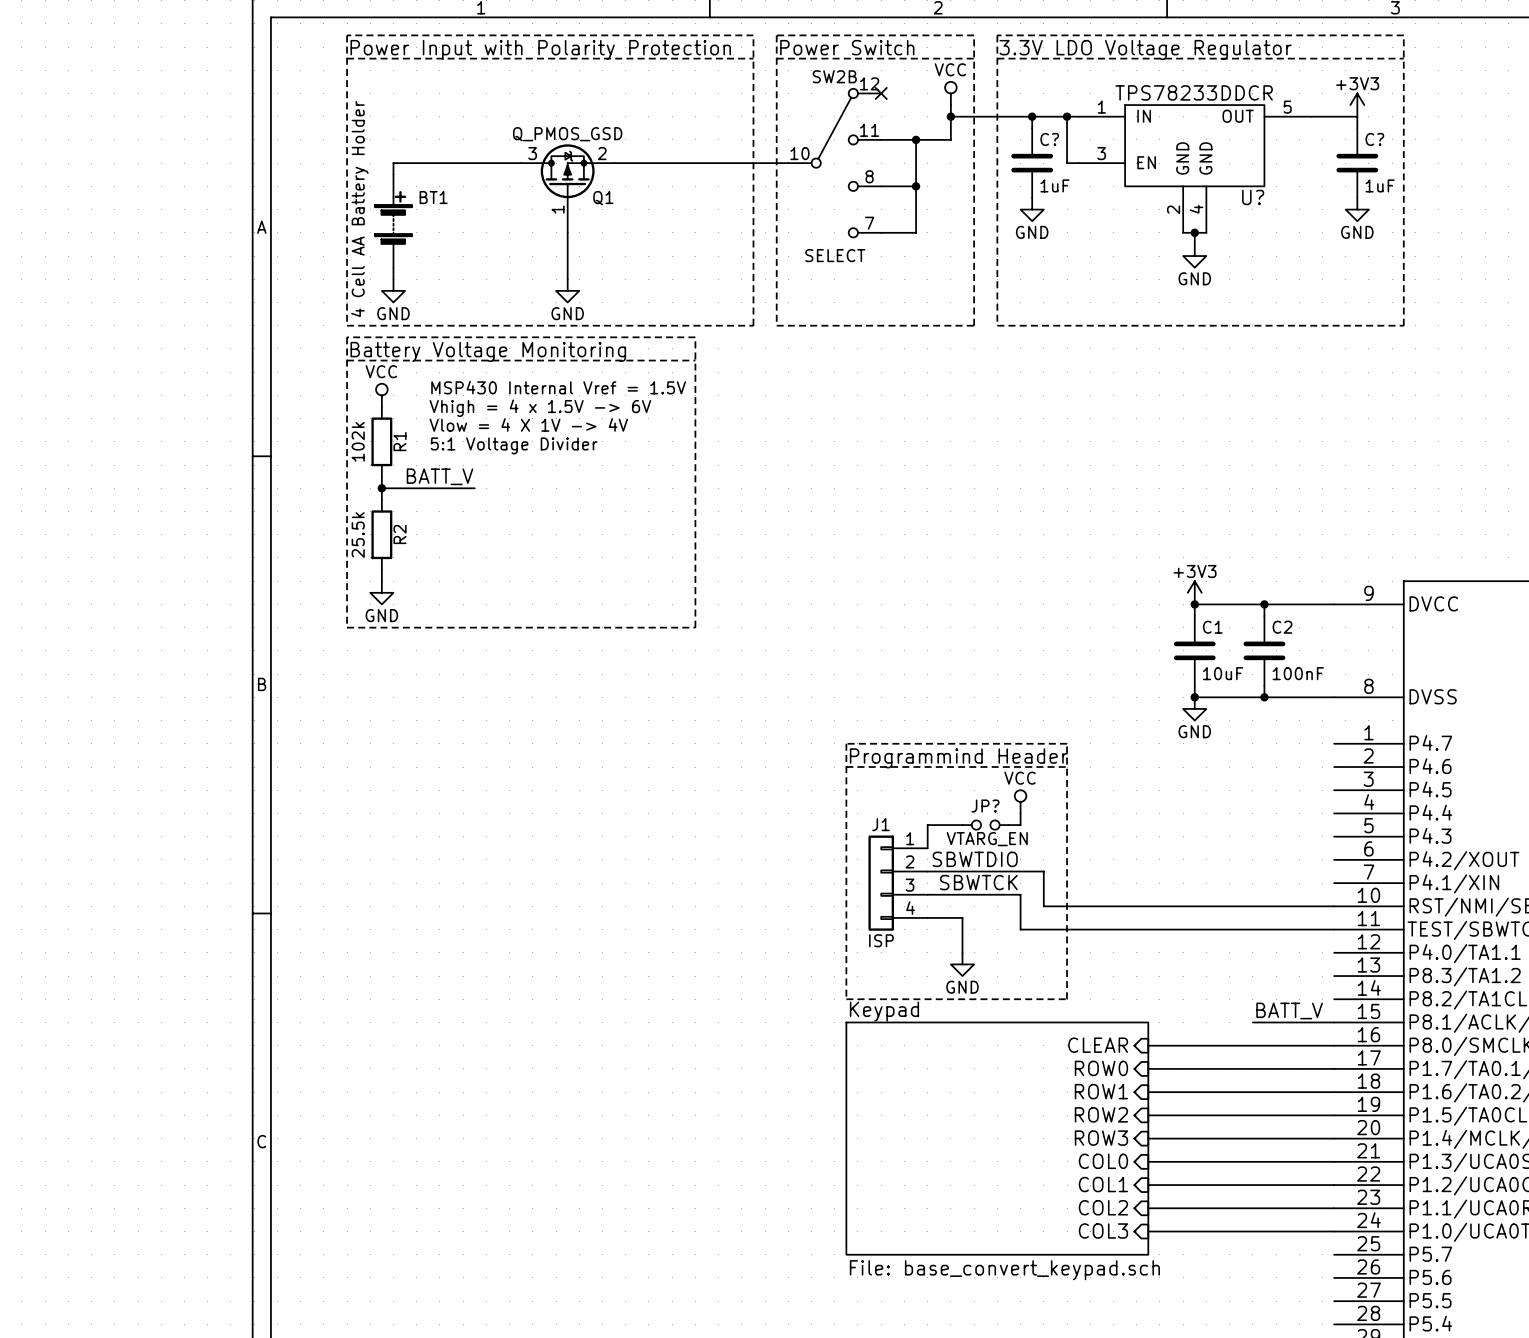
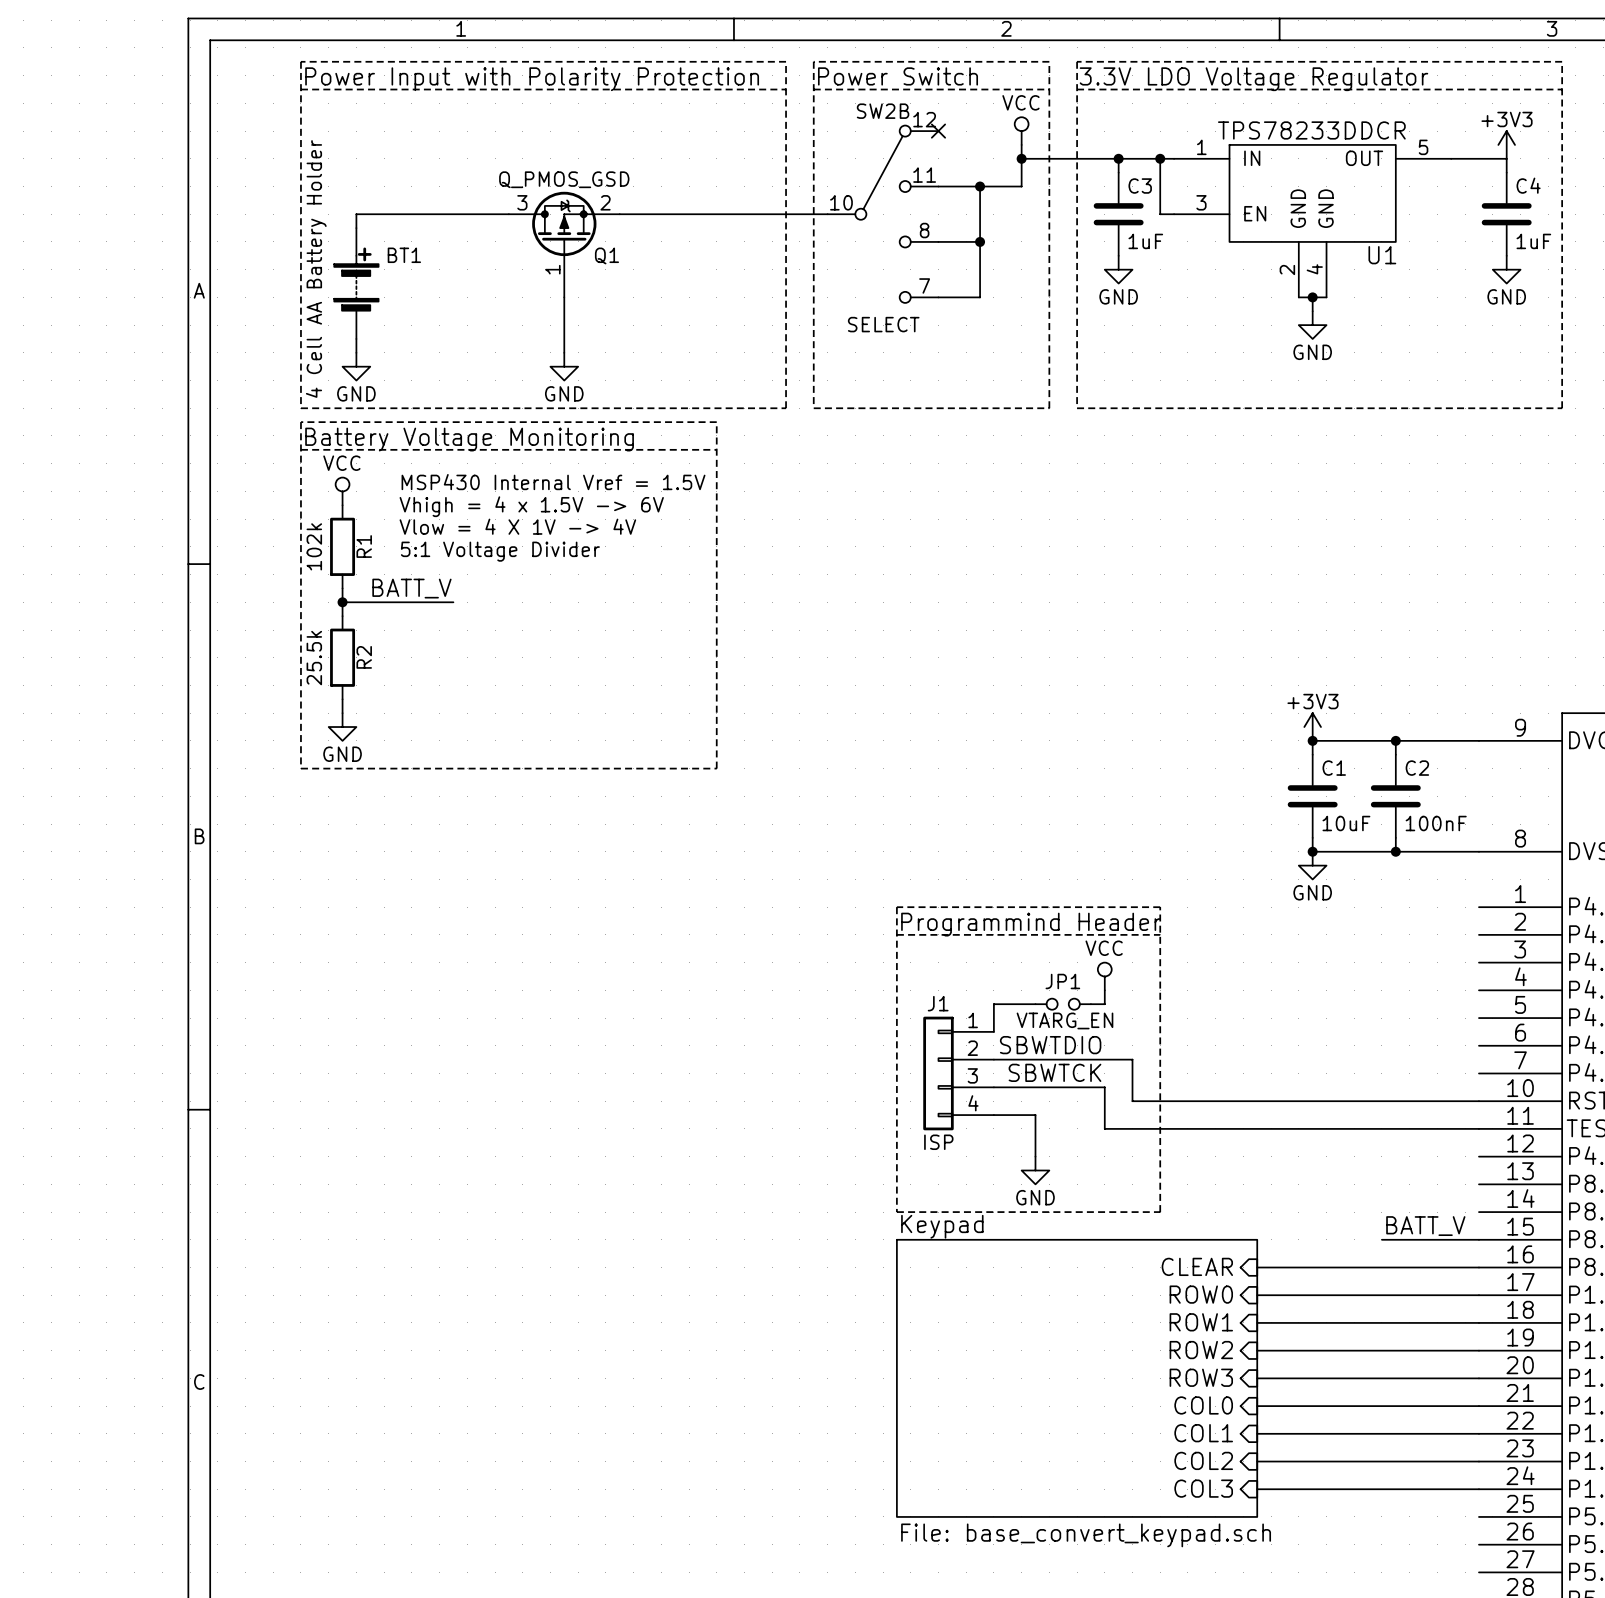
C? name: C? (1049, 139) -> C3 (1140, 186)
C? name: C? (1374, 139) -> C4 (1528, 185)
U? name: U? (1253, 197) -> U1 (1382, 255)
JP? name: JP? (985, 806) -> JP1 (1062, 981)

